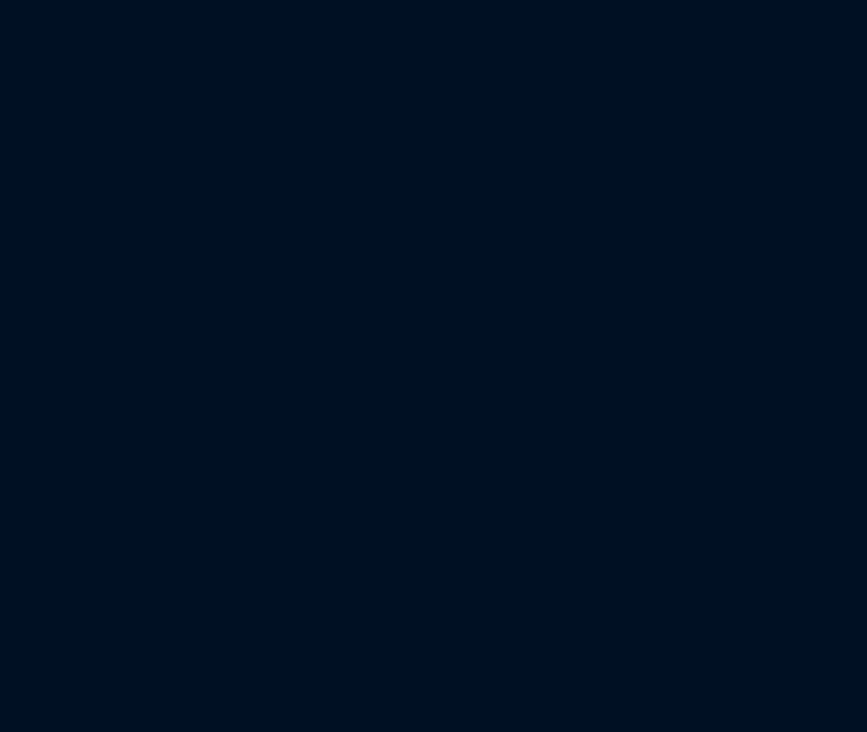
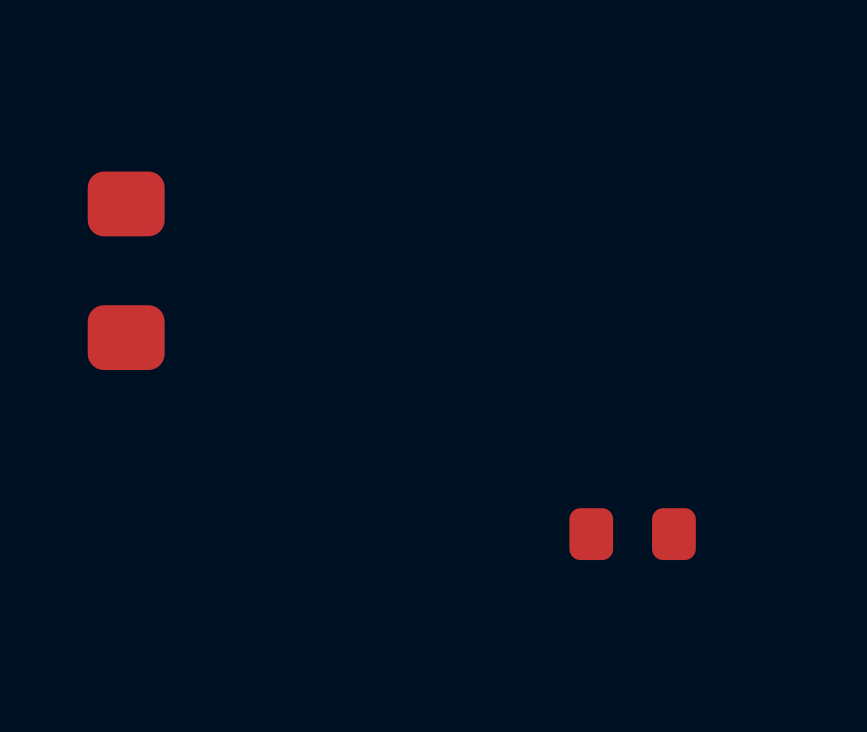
part: none -> (126, 270)
part: none -> (632, 534)

